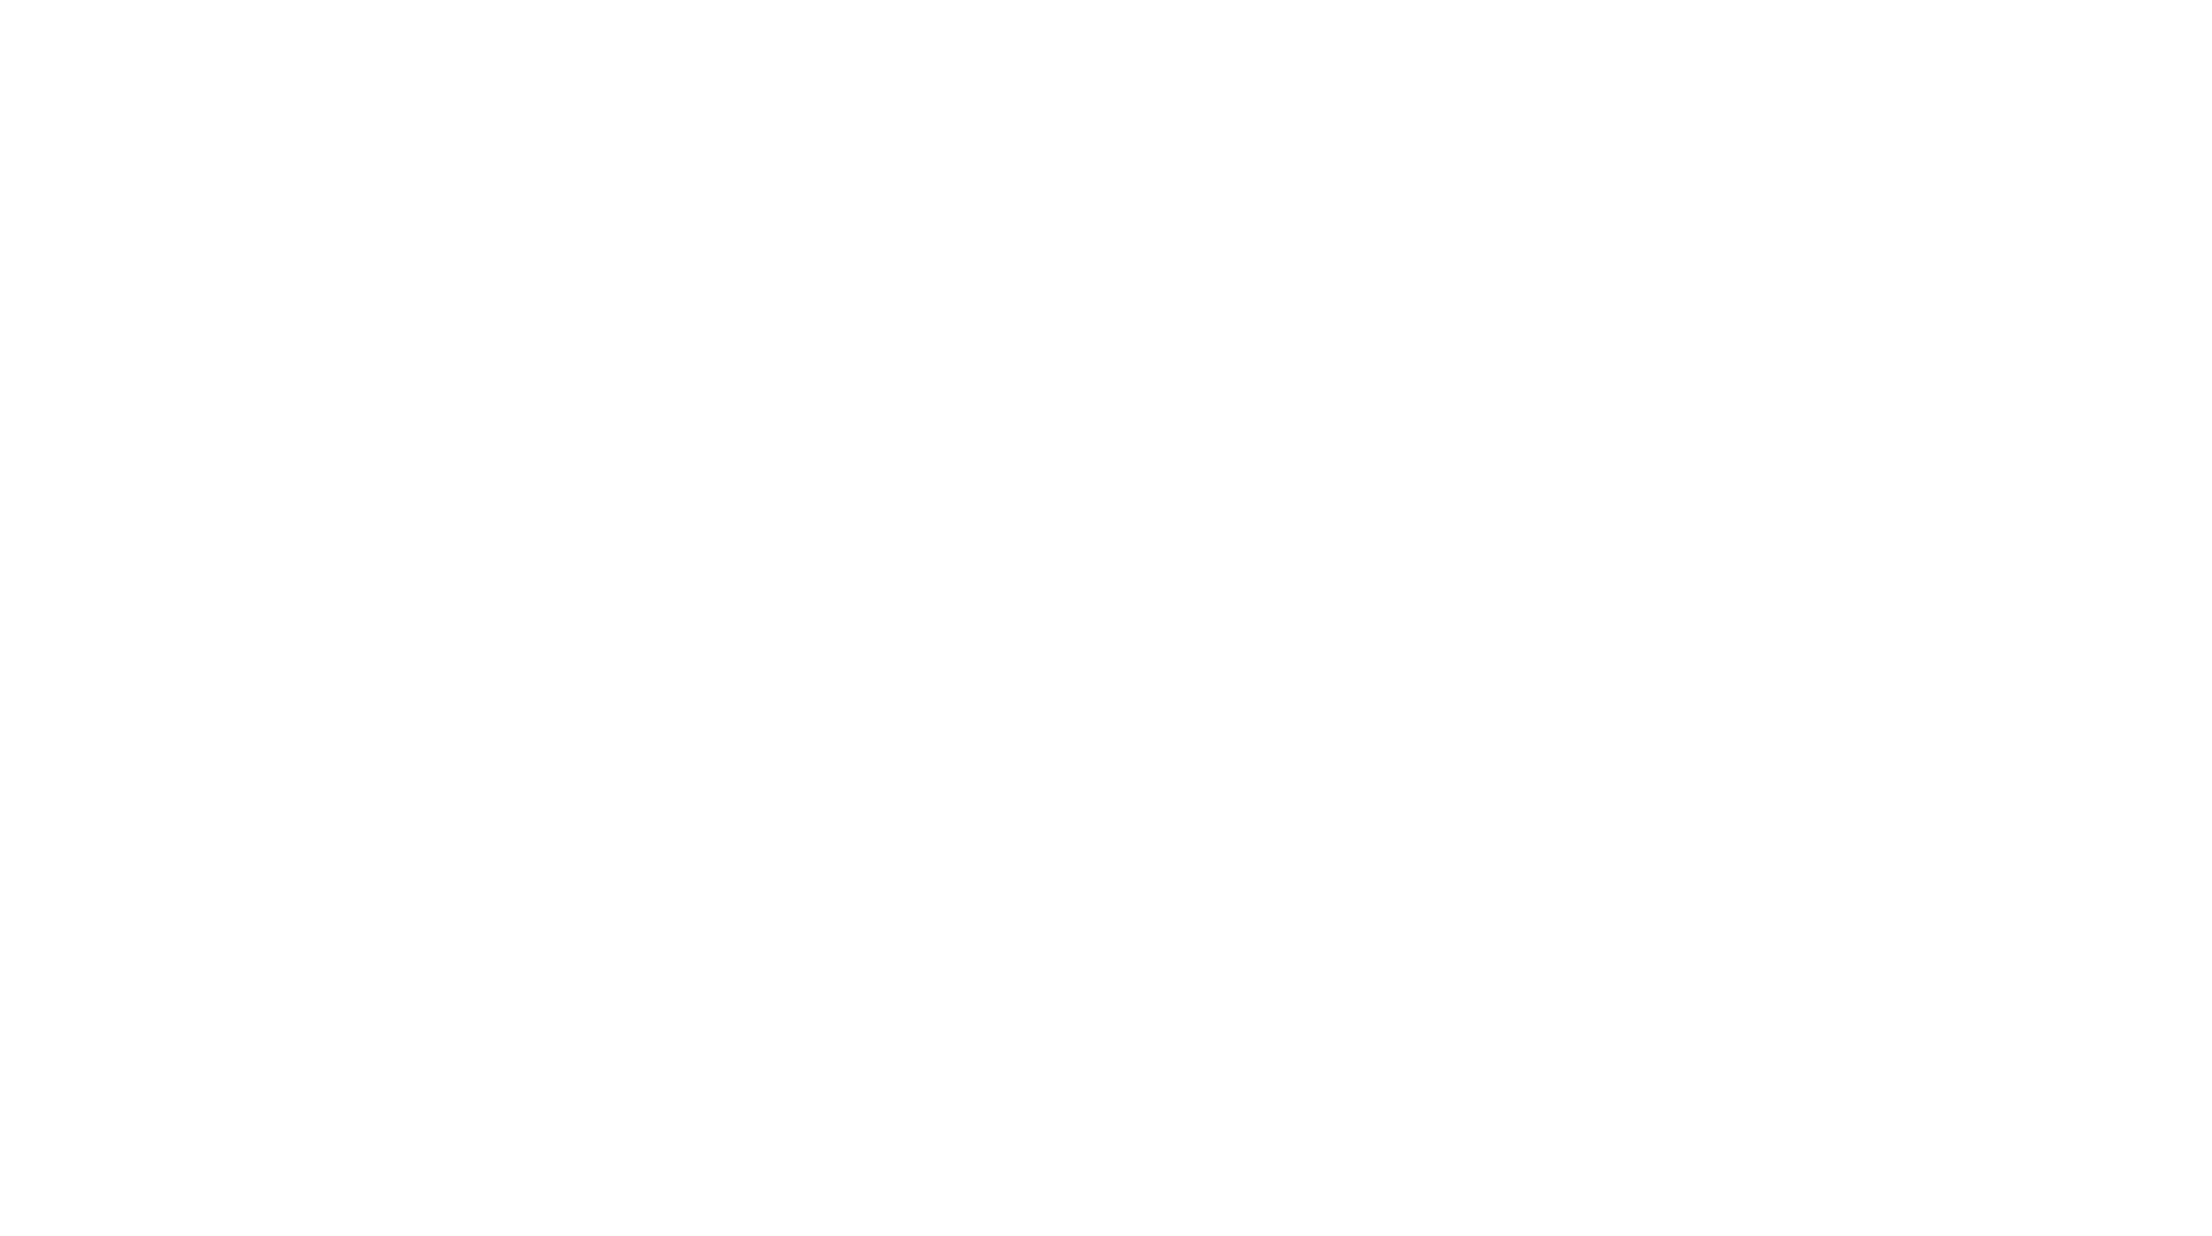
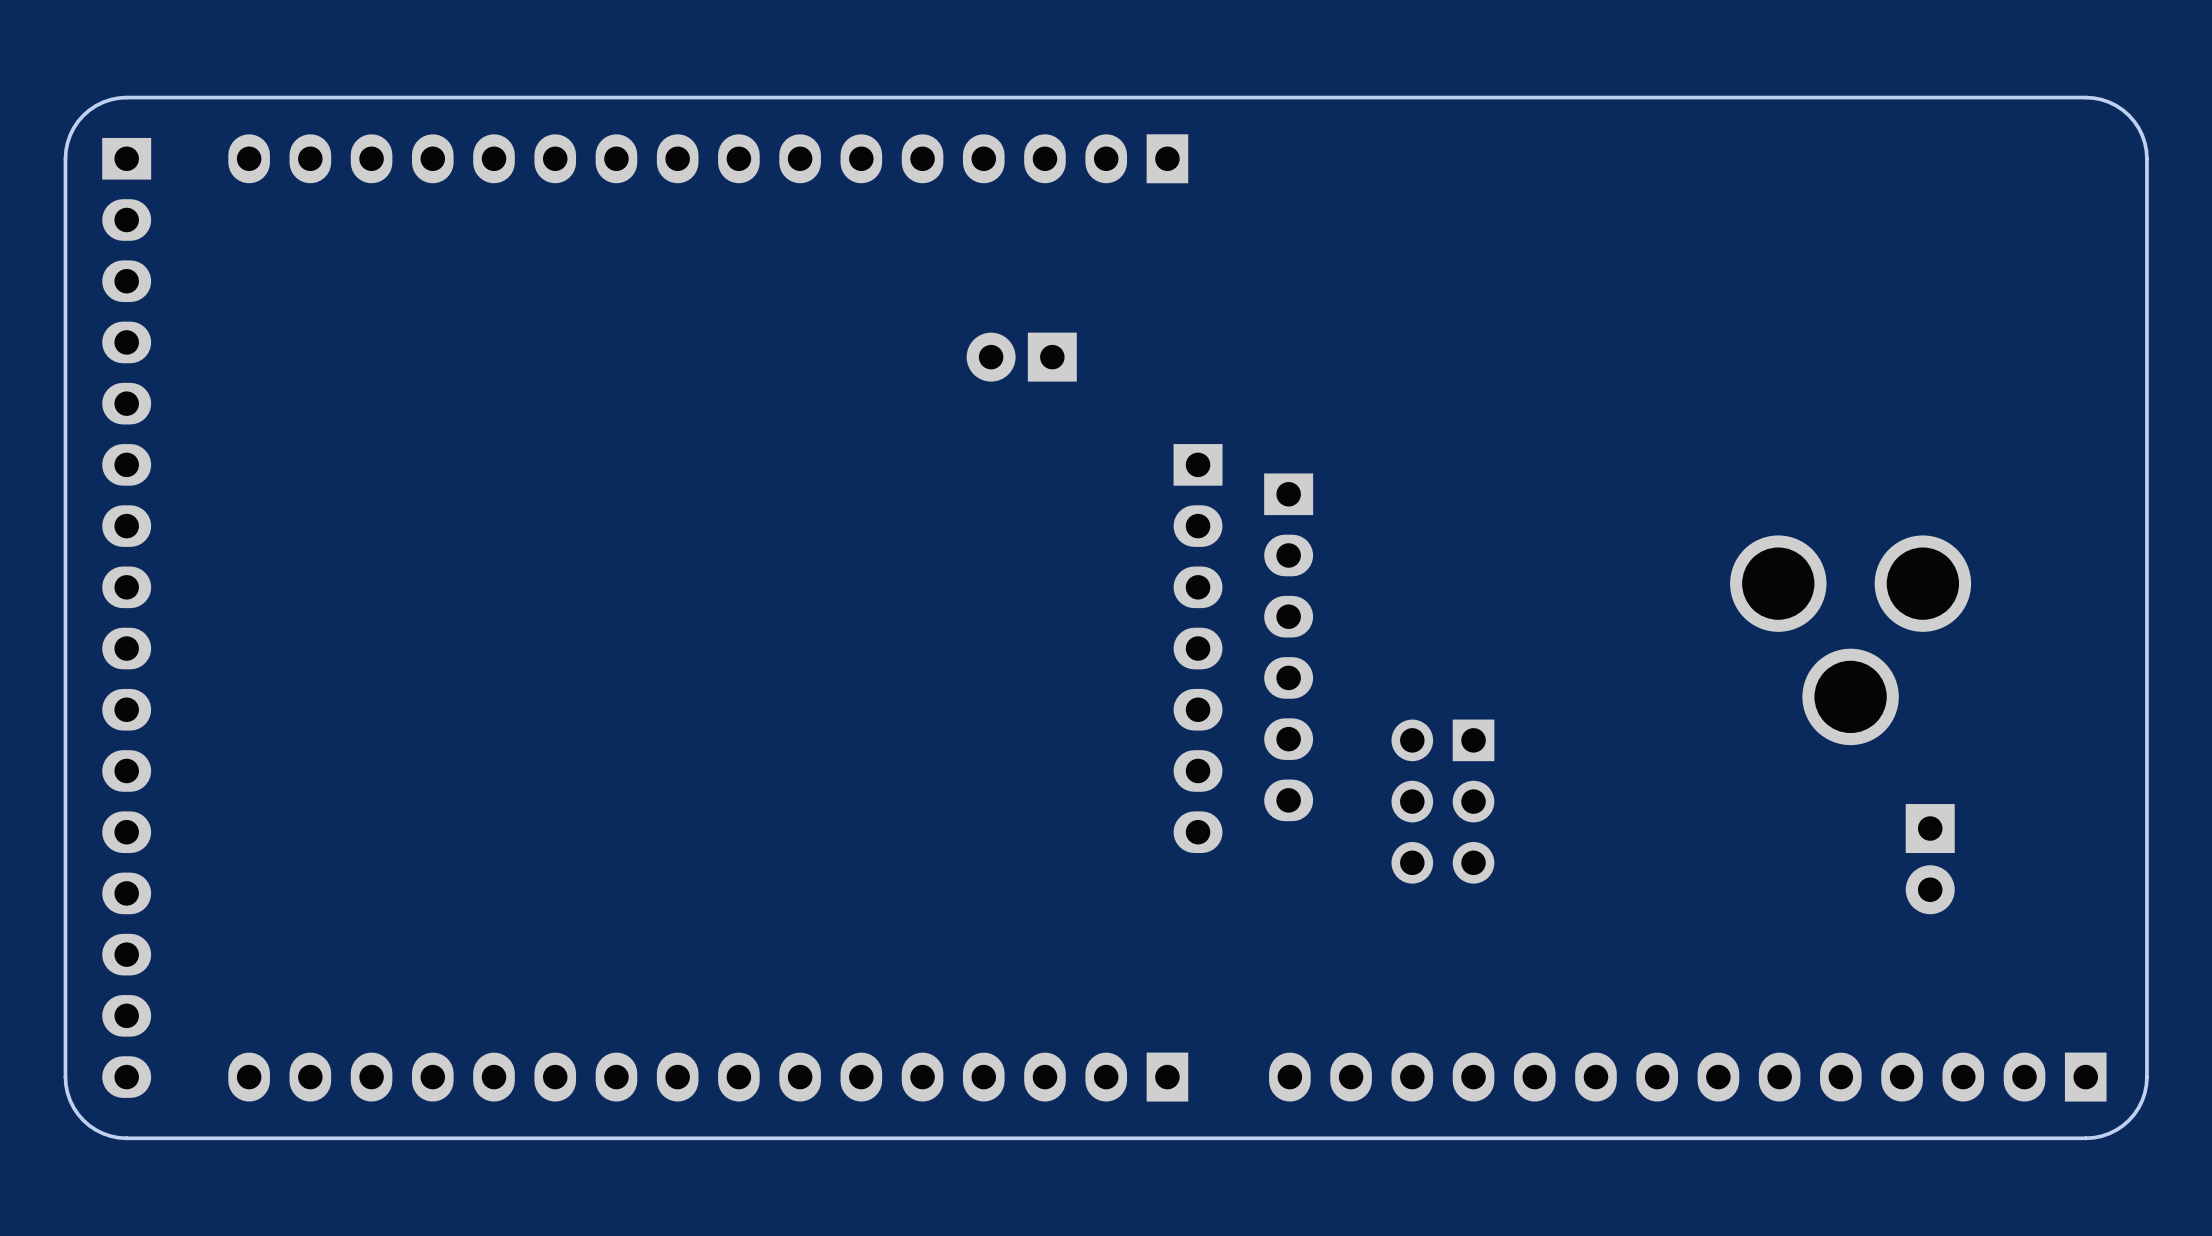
board edge: none -> (2085, 97) (126, 97) (110, 99) (96, 105) (83, 115) (73, 128) (67, 142) (65, 158) (65, 1077) (67, 1092) (73, 1107) (83, 1120) (96, 1130) (110, 1136) (126, 1138) (2085, 1138) (2101, 1136) (2116, 1130) (2129, 1120) (2138, 1107) (2144, 1092) (2146, 1077) (2146, 158) (2142, 135) (2129, 115) (2109, 102) (2085, 97)
part: none -> (708, 158)
part: none -> (1021, 357)
part: none -> (126, 617)
part: none -> (1850, 640)
part: none -> (1288, 647)
part: none -> (1198, 648)
part: none -> (1442, 801)
part: none -> (1930, 859)
part: none -> (708, 1077)
part: none -> (1687, 1077)

